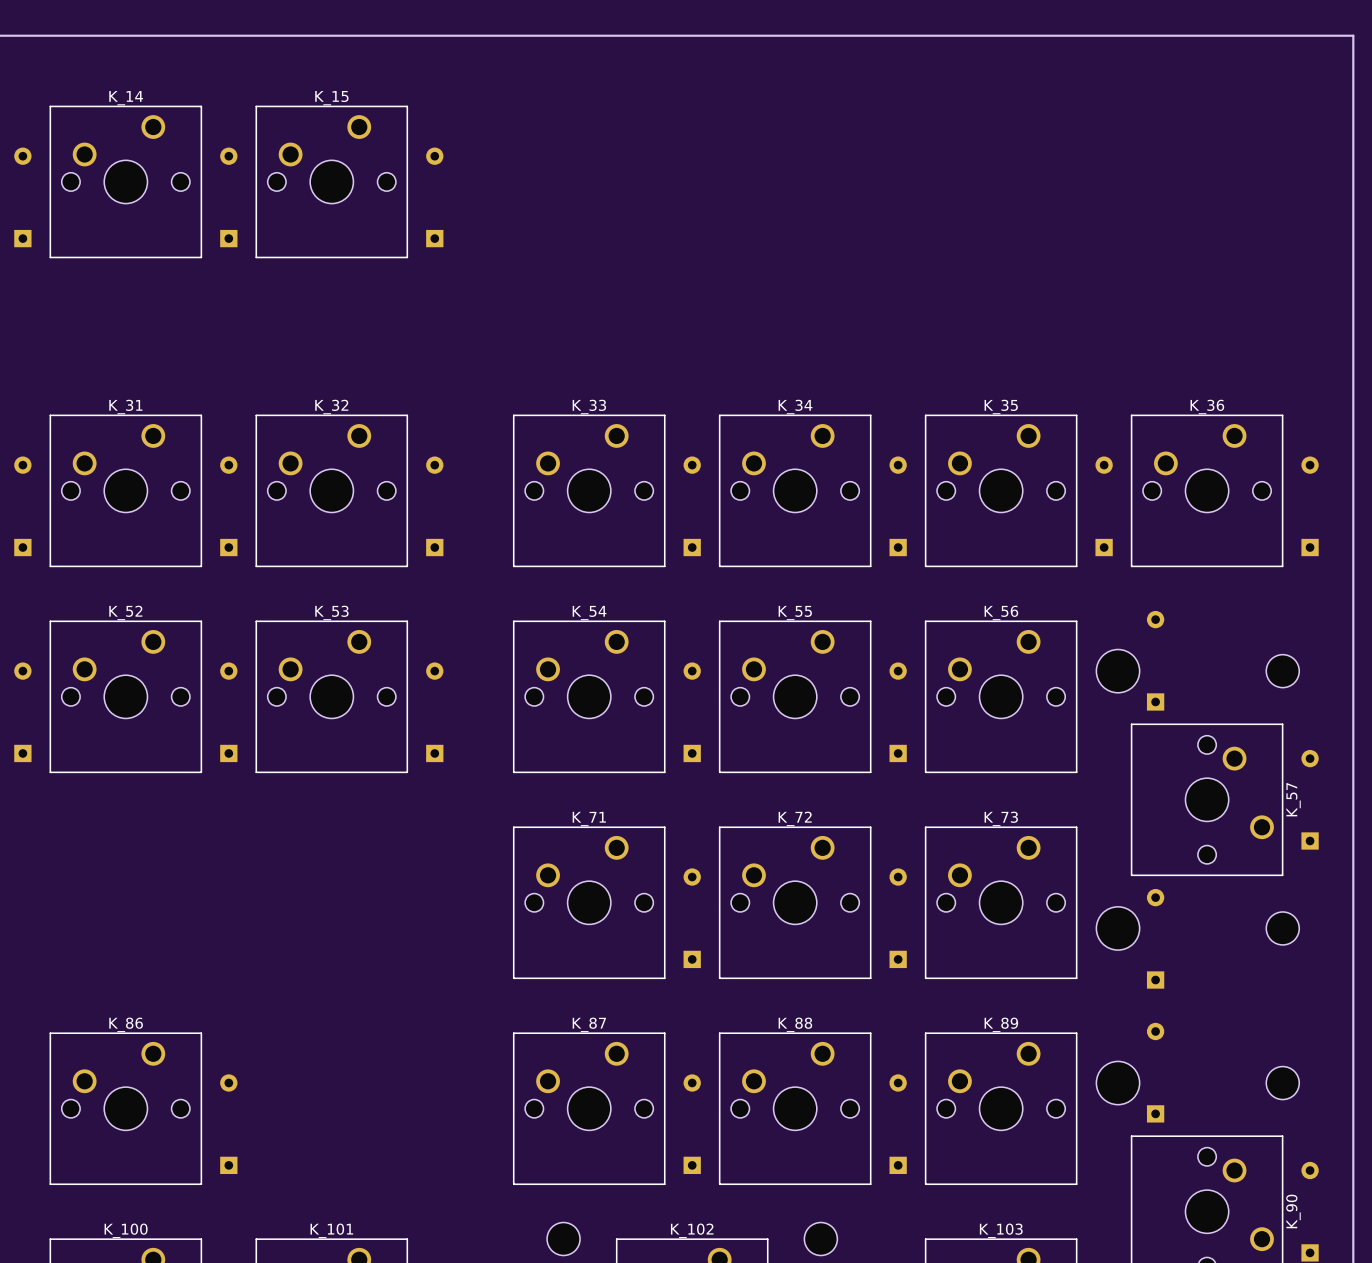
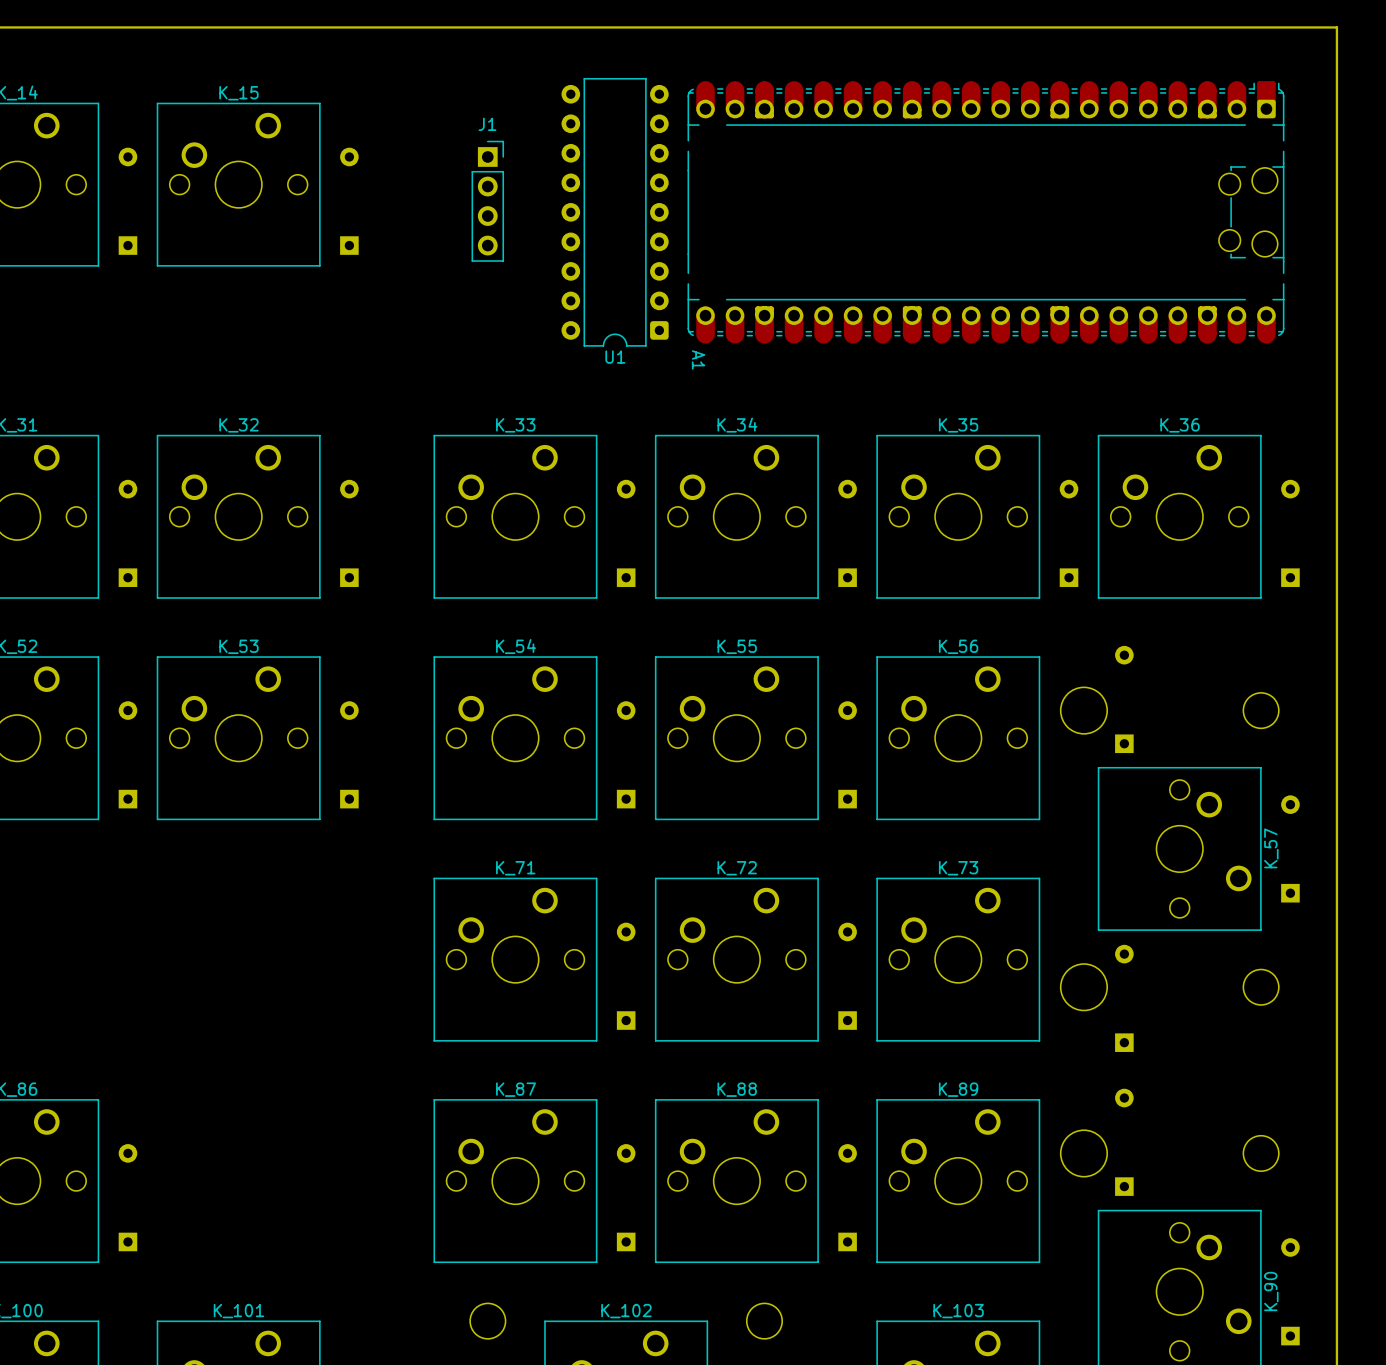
J1: none -> (487, 201)
U1: none -> (615, 212)
A1: none -> (985, 212)

